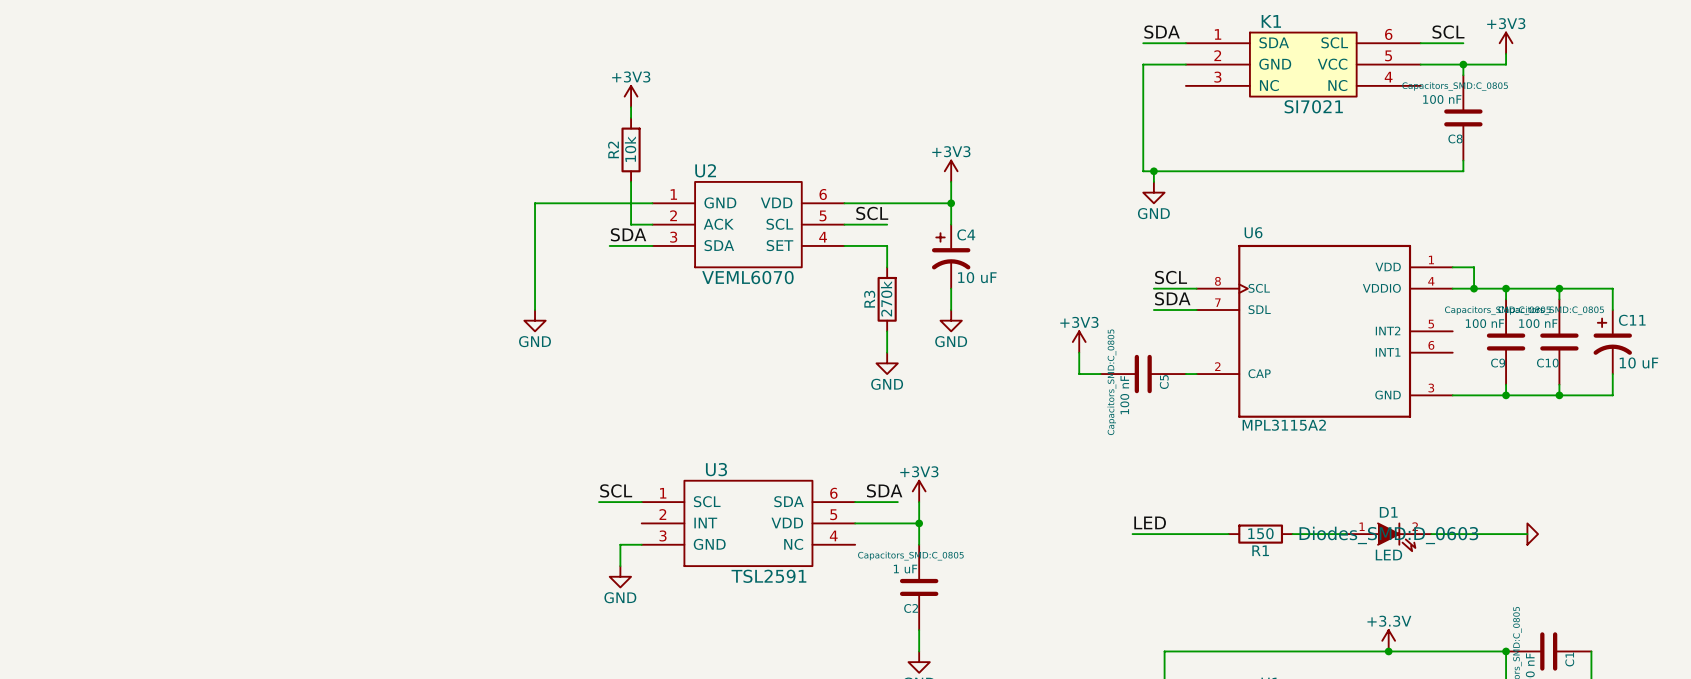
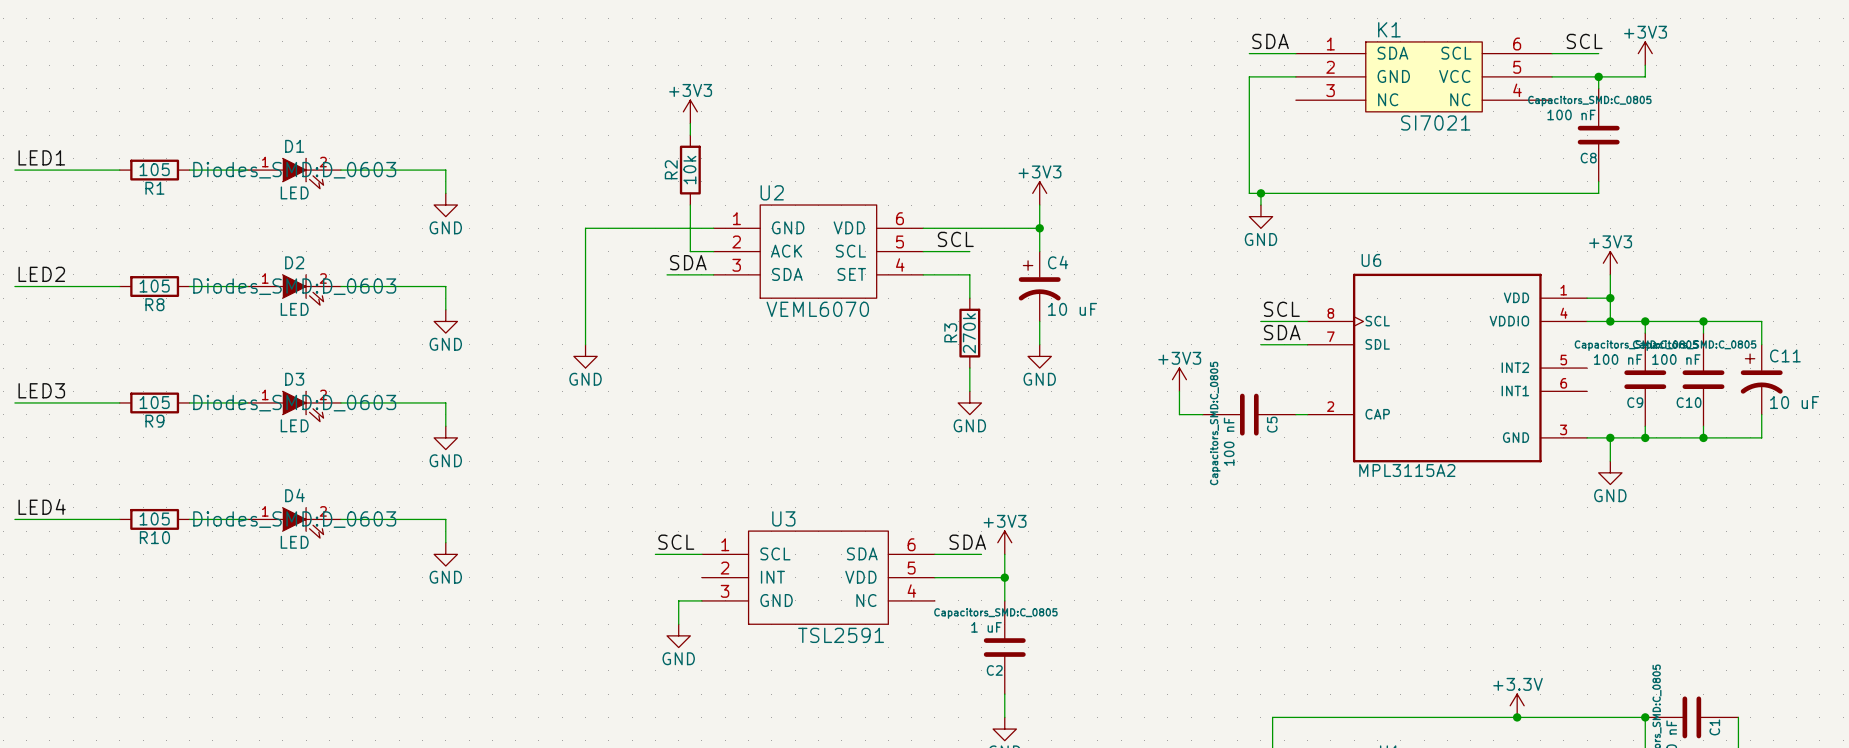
label: none -> LED1 (41, 157)
wire: none -> (14, 170) (119, 170)
wire: none -> (189, 170) (247, 170)
wire: none -> (340, 170) (445, 170) (445, 193)
power symbol: none -> GND (445, 205)
power symbol: none -> +3V3 (1610, 263)
label: none -> LED2 (41, 274)
wire: none -> (1610, 274) (1610, 298)
wire: none -> (14, 286) (119, 286)
R8: none -> 105 (154, 286)
wire: none -> (189, 286) (247, 286)
wire: none -> (340, 286) (445, 286) (445, 309)
D2: none -> LED (294, 290)
junction: none -> (1610, 298)
power symbol: none -> GND (445, 321)
label: none -> LED3 (41, 390)
wire: none -> (14, 402) (119, 402)
R9: none -> 105 (154, 402)
wire: none -> (189, 402) (247, 402)
wire: none -> (340, 402) (445, 402) (445, 426)
D3: none -> LED (294, 406)
power symbol: none -> GND (445, 437)
wire: none -> (1610, 437) (1610, 461)
junction: none -> (1610, 437)
power symbol: none -> GND (1610, 472)
label: none -> LED4 (42, 506)
wire: none -> (14, 519) (119, 519)
R10: none -> 105 (154, 519)
wire: none -> (189, 519) (247, 519)
wire: none -> (340, 519) (445, 519) (445, 542)
D4: none -> LED (294, 522)
power symbol: none -> GND (445, 554)
label: LED (1150, 522) -> none
R1 value: 150 (1260, 533) -> 105 (154, 169)
wire: (1132, 534) (1228, 534) -> none
R1 position: (1260, 534) -> (154, 170)
wire: (1292, 534) (1345, 534) -> none
wire: (1431, 534) (1527, 534) -> none
power symbol: (1532, 534) -> none
D1 position: (1388, 537) -> (294, 173)

